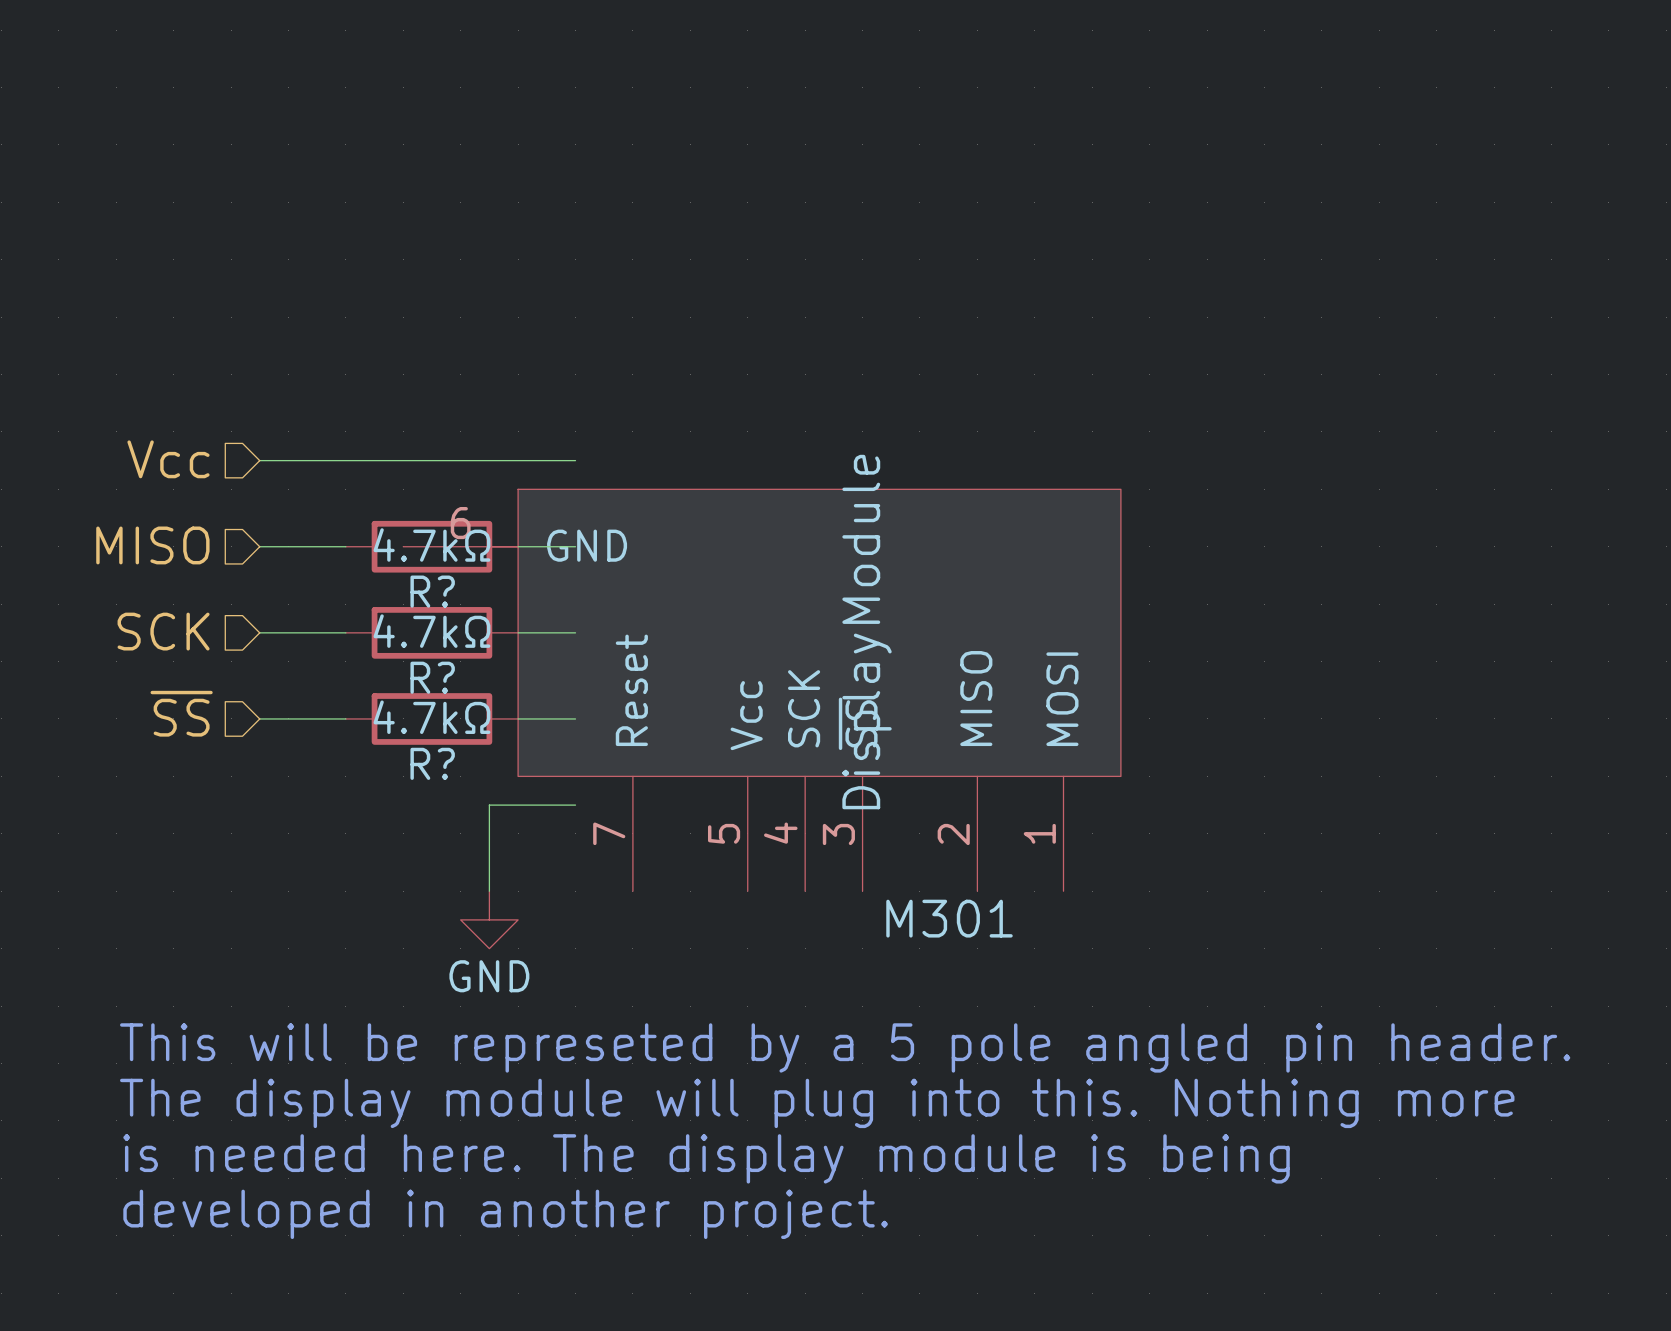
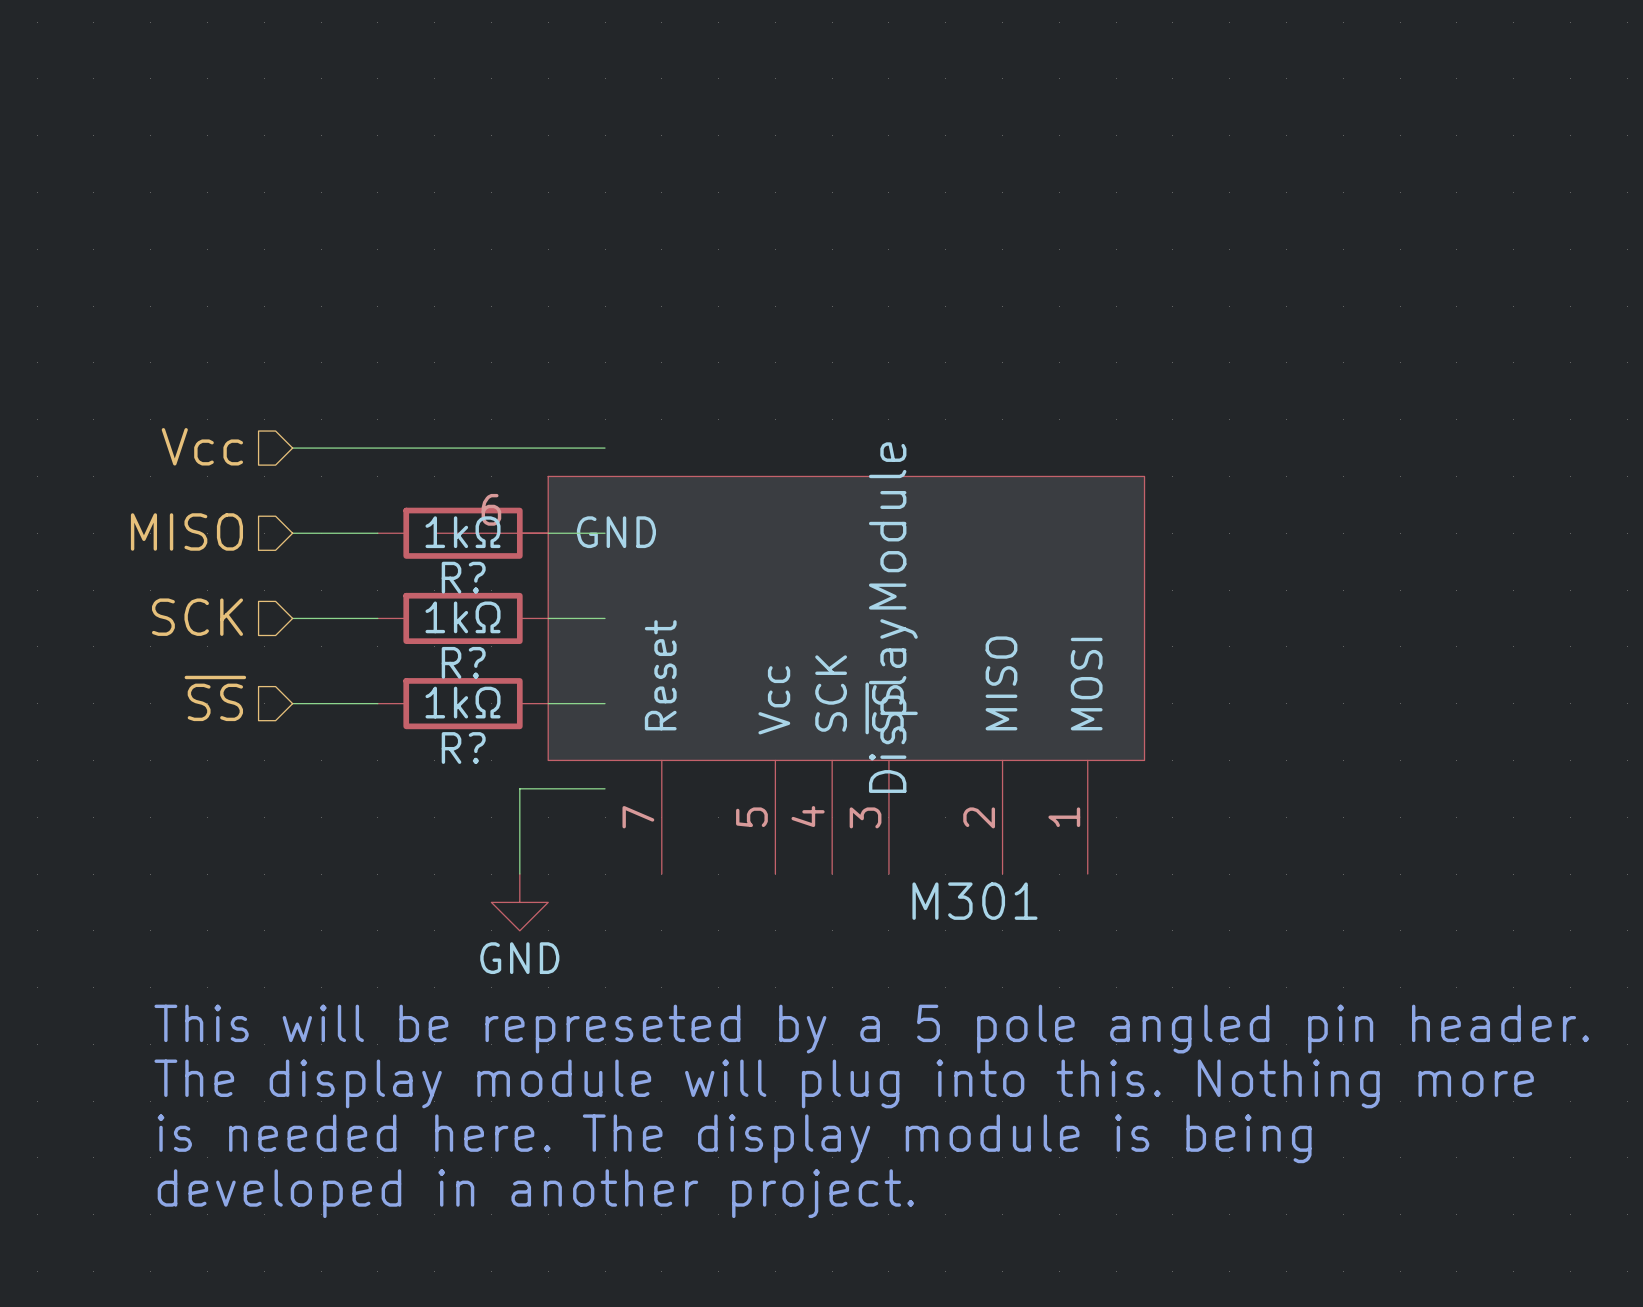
R? value: 4.7kΩ (431, 544) -> 1kΩ (463, 532)
R? value: 4.7kΩ (431, 631) -> 1kΩ (463, 617)
R? value: 4.7kΩ (431, 717) -> 1kΩ (463, 702)

